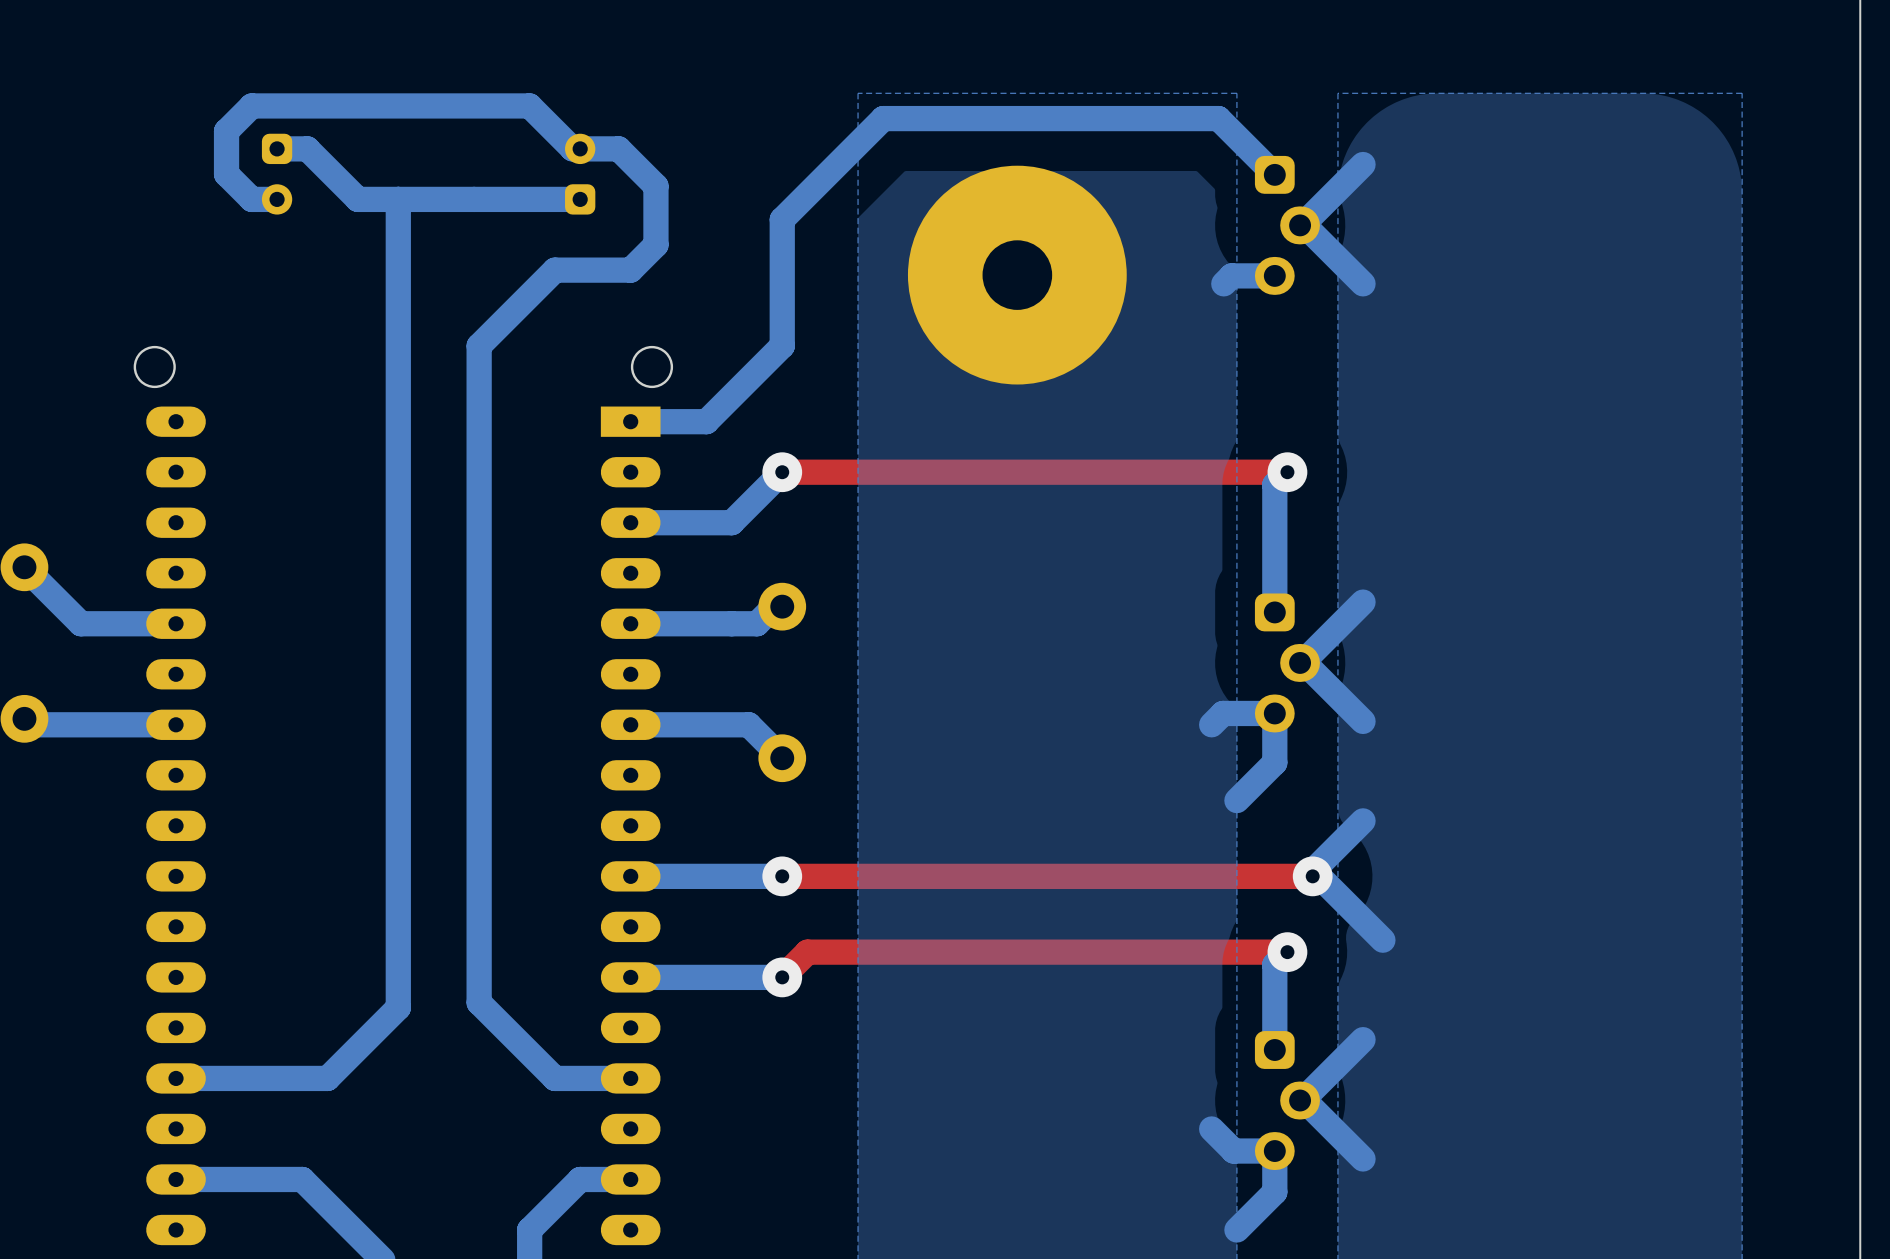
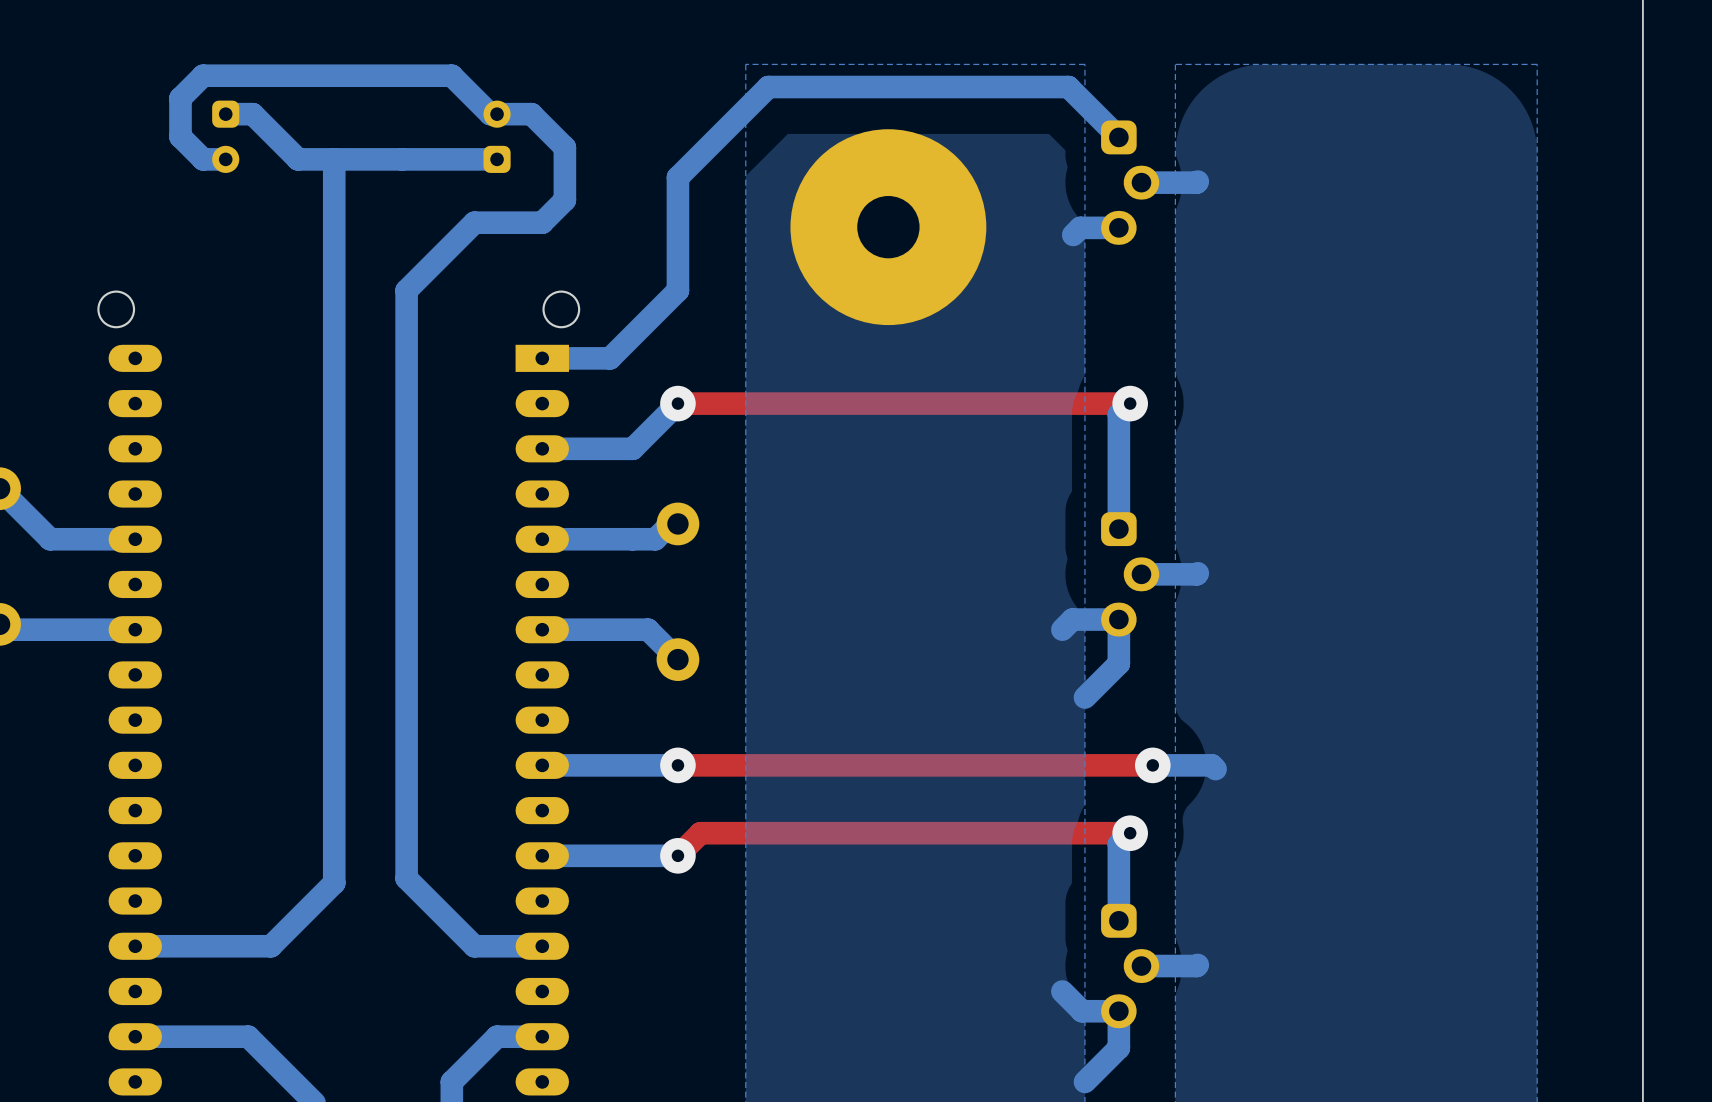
bottom track: (1363, 164) (1302, 225) -> none
bottom track: (1304, 225) (1363, 283) -> (1145, 182) (1197, 181)
bottom track: (1363, 602) (1302, 662) -> none
bottom track: (1304, 662) (1363, 721) -> (1145, 574) (1197, 573)
bottom track: (1363, 820) (1312, 871) (1312, 876) -> none
bottom track: (1319, 876) (1382, 940) -> (1158, 765) (1211, 765) (1215, 769)
bottom track: (1363, 1039) (1302, 1100) -> none
bottom track: (1304, 1100) (1363, 1158) -> (1145, 966) (1197, 964)

